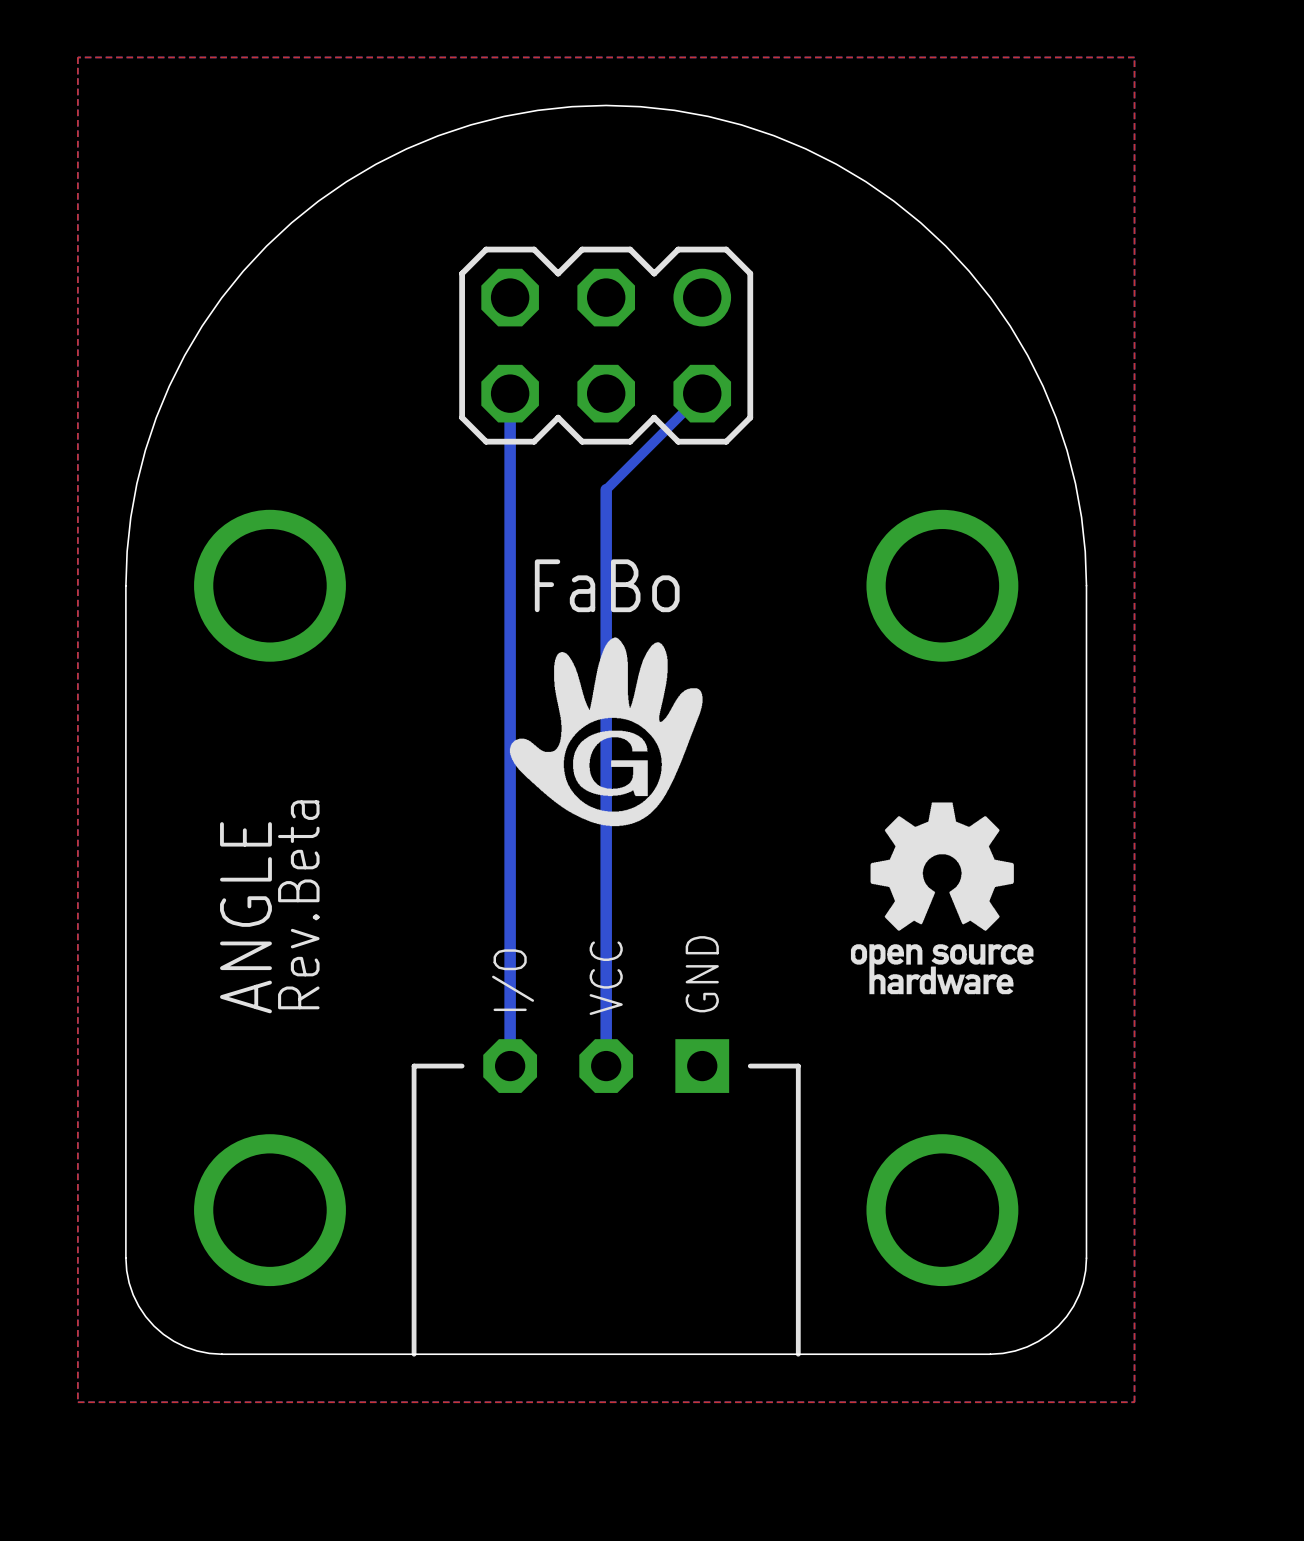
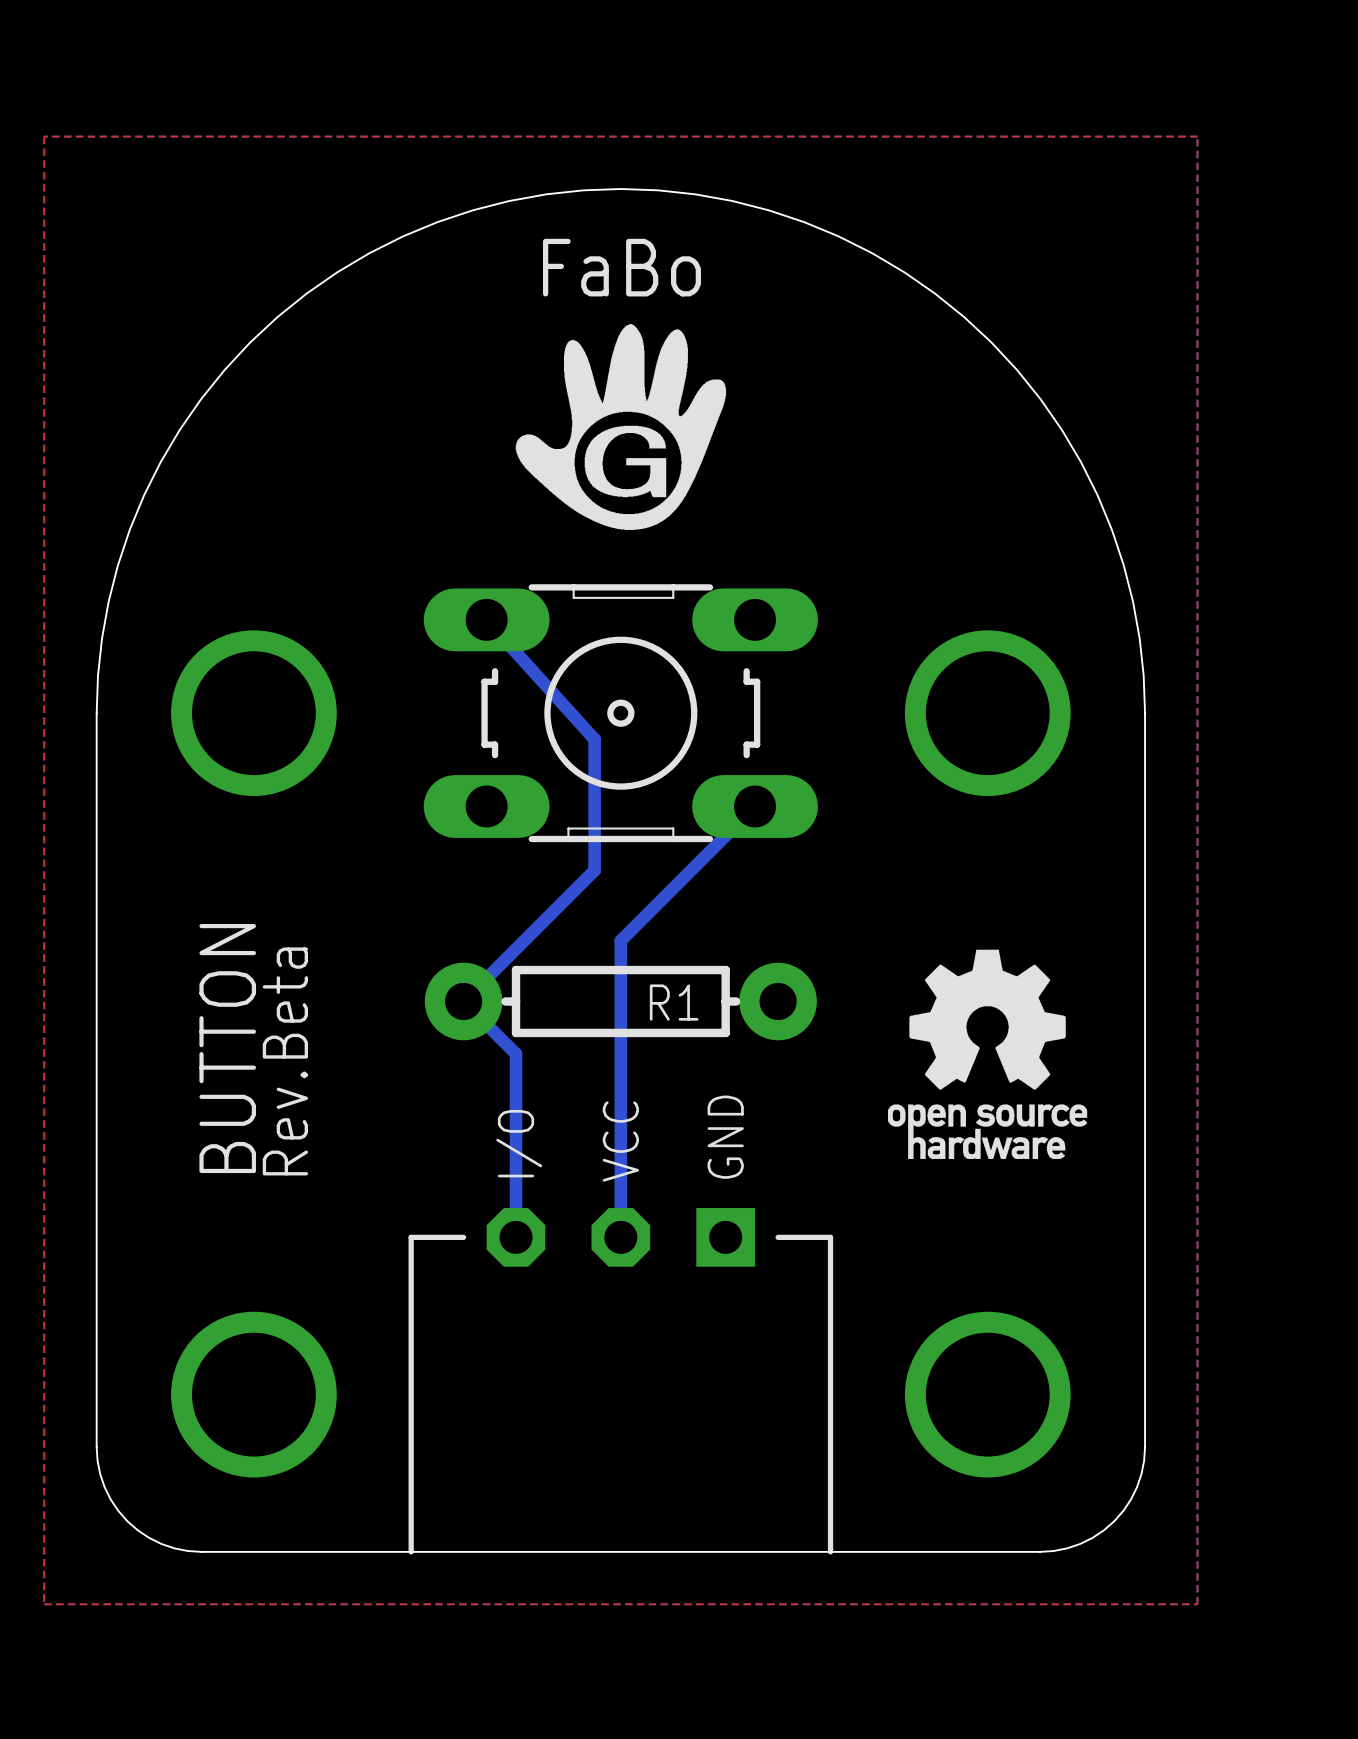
part: (606, 345) -> none
bottom track: (510, 393) (510, 897) -> (486, 619) (594, 739) (594, 870) (463, 1001) (516, 1053)
bottom track: (702, 393) (606, 489) (606, 794) -> (755, 806) (620, 940)
part: none -> (620, 713)
drawing position: (606, 731) -> (620, 427)
R1: none -> (620, 1001)
text: ANGLE (245, 917) -> BUTTON (227, 1048)

